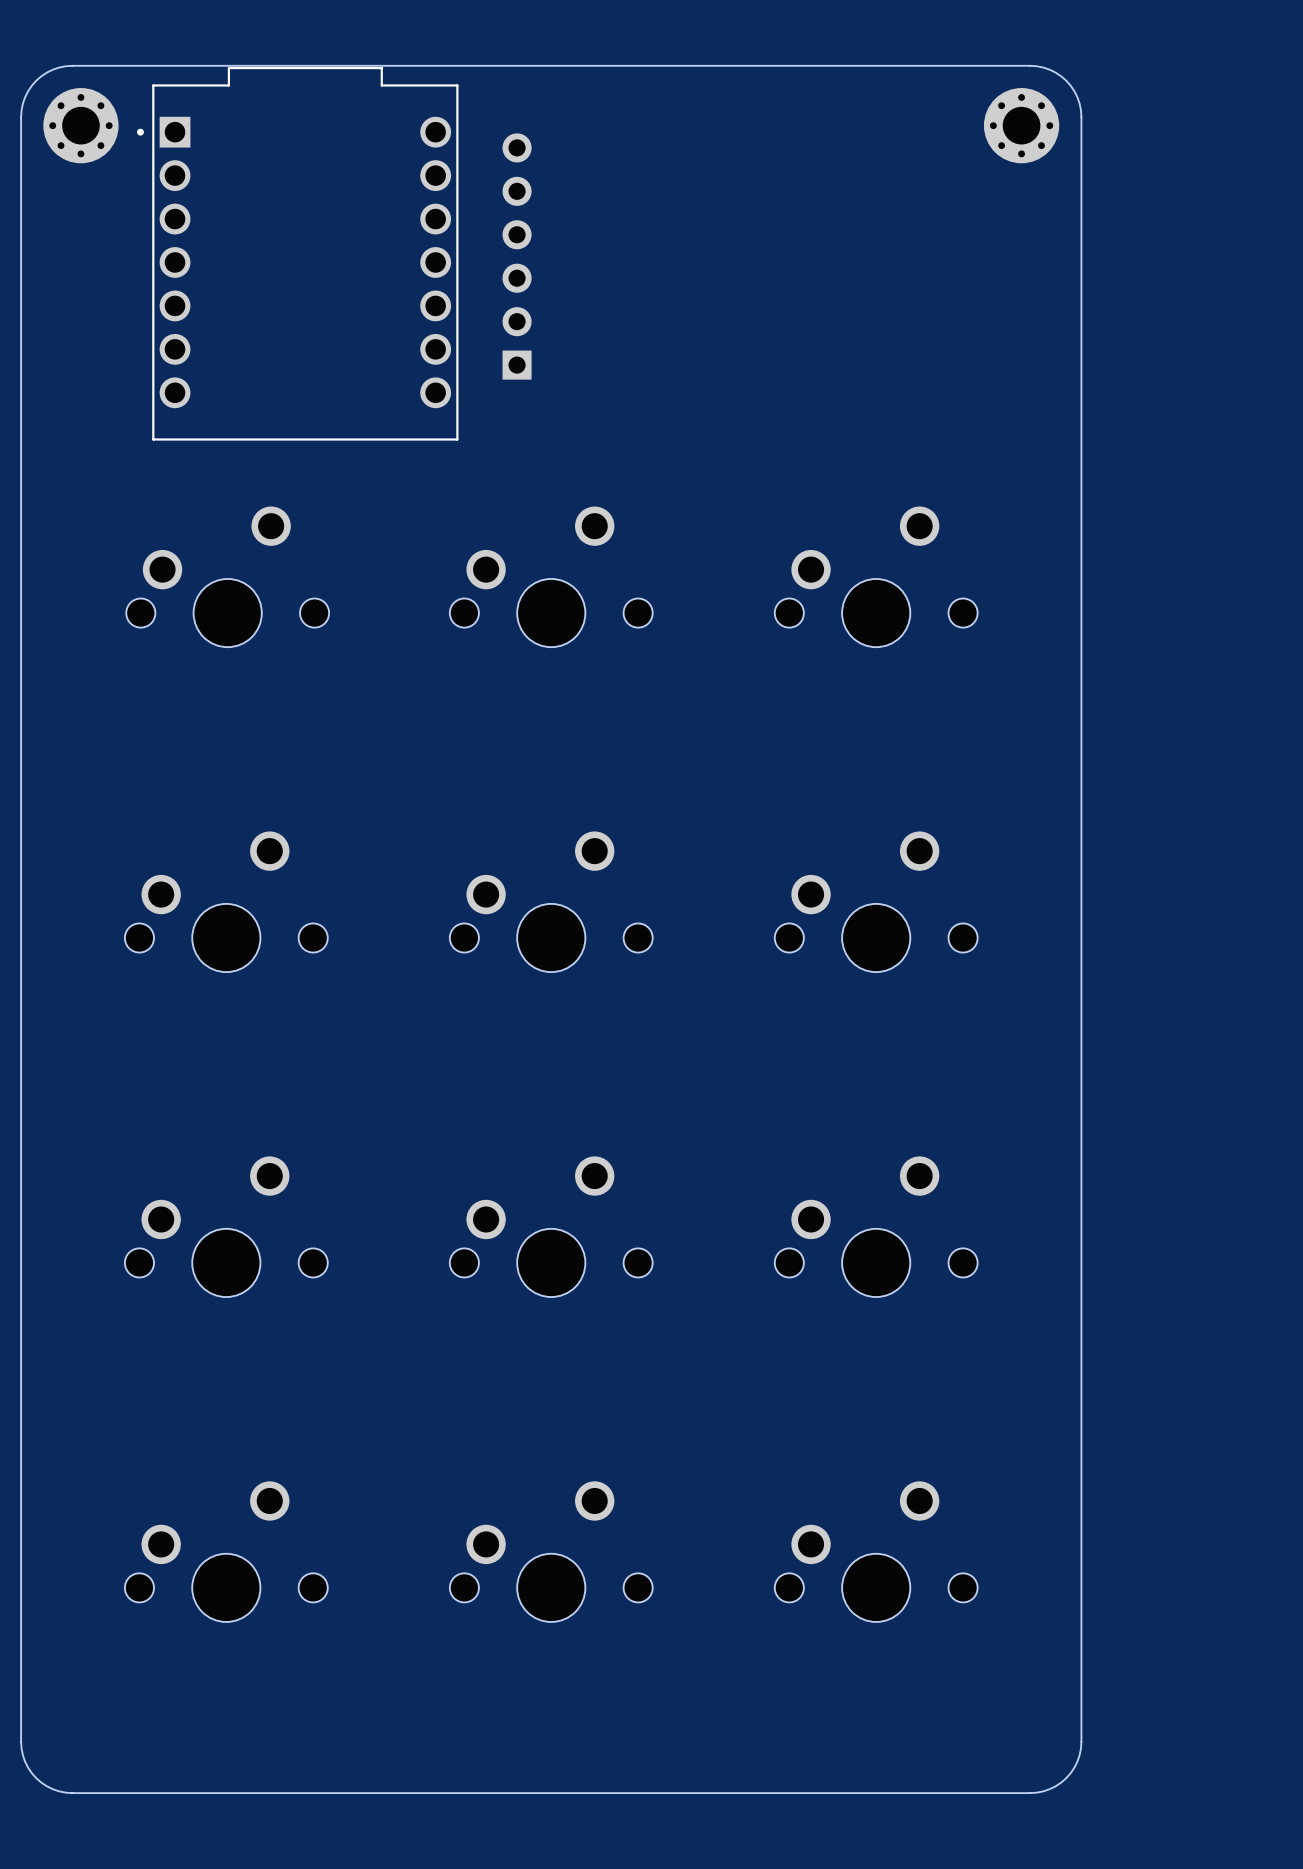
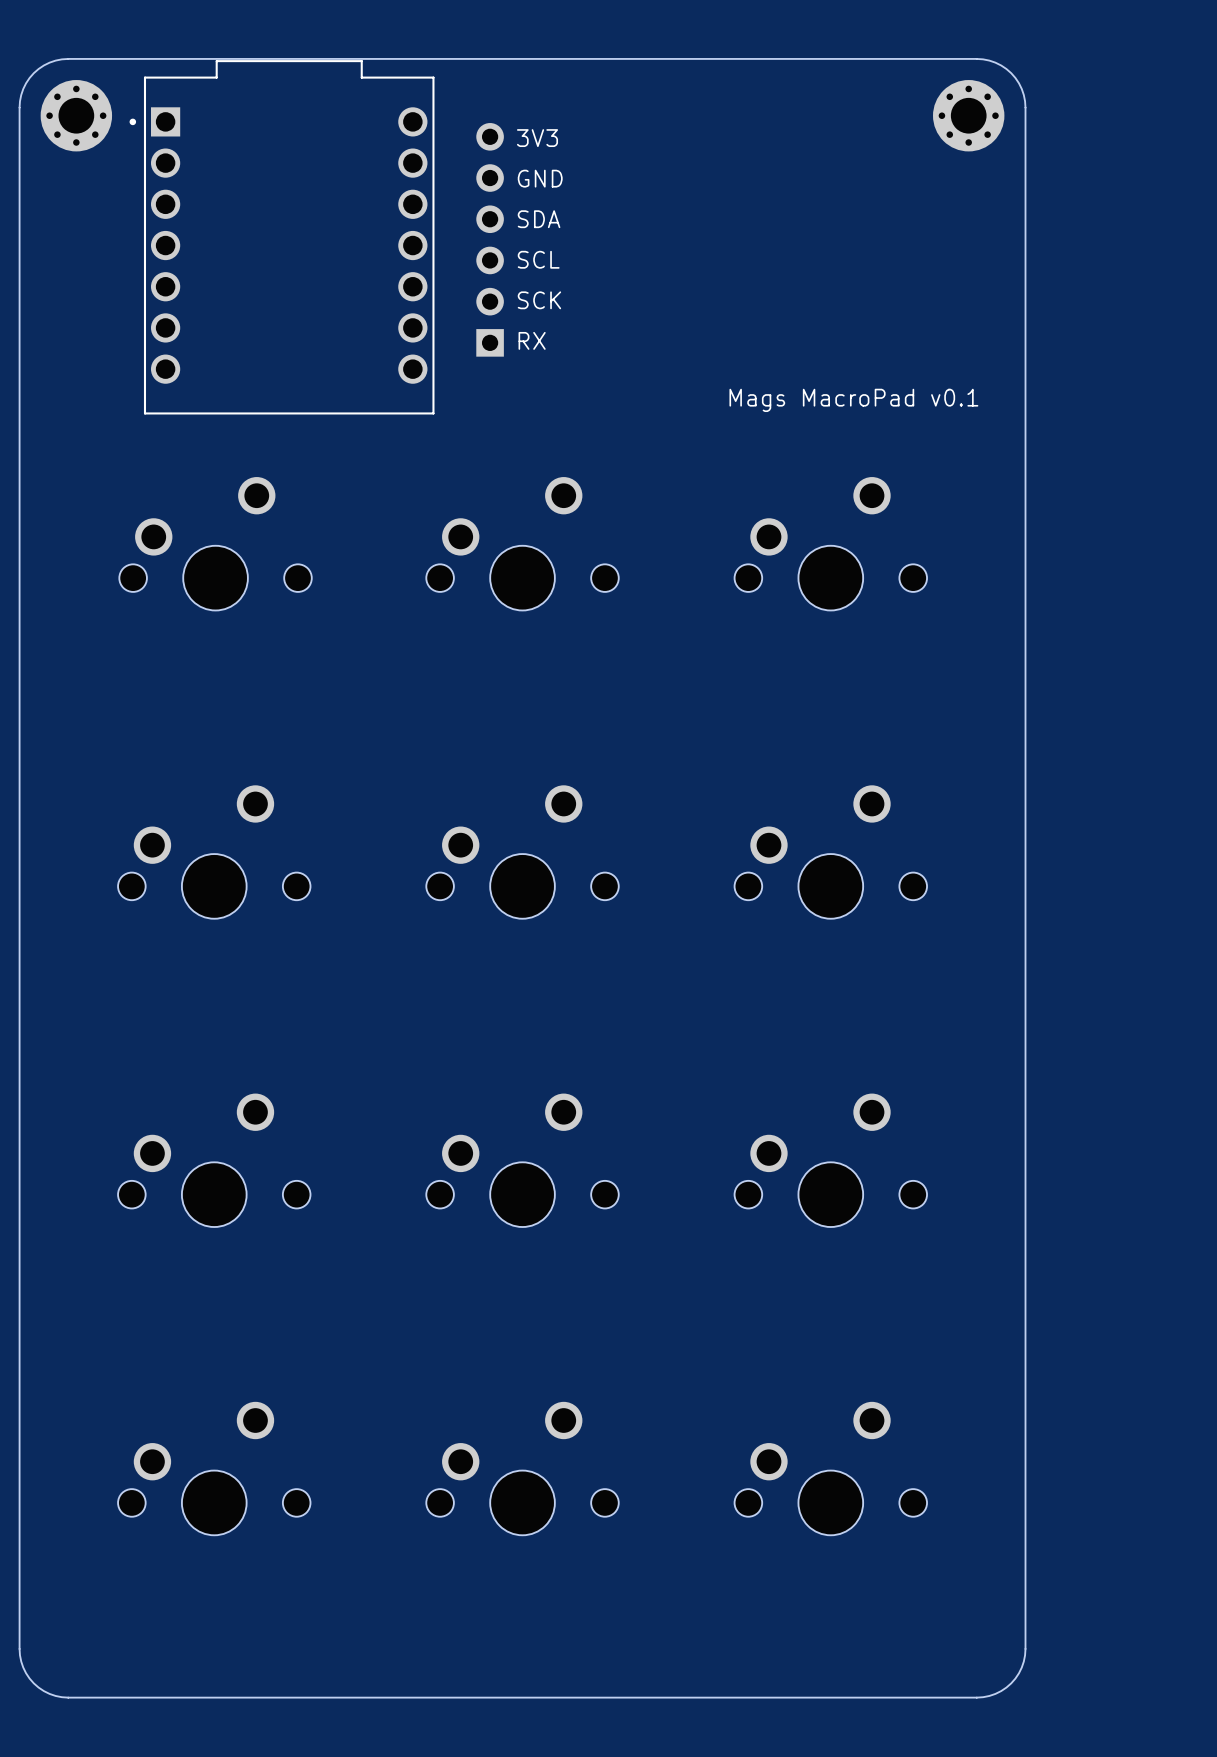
text: none -> 3V3 (537, 138)
text: none -> GND (540, 178)
text: none -> SDA (539, 219)
text: none -> SCL (538, 259)
text: none -> SCK (539, 300)
text: none -> RX (532, 340)
text: none -> Mags MacroPad v0.1 (853, 400)

